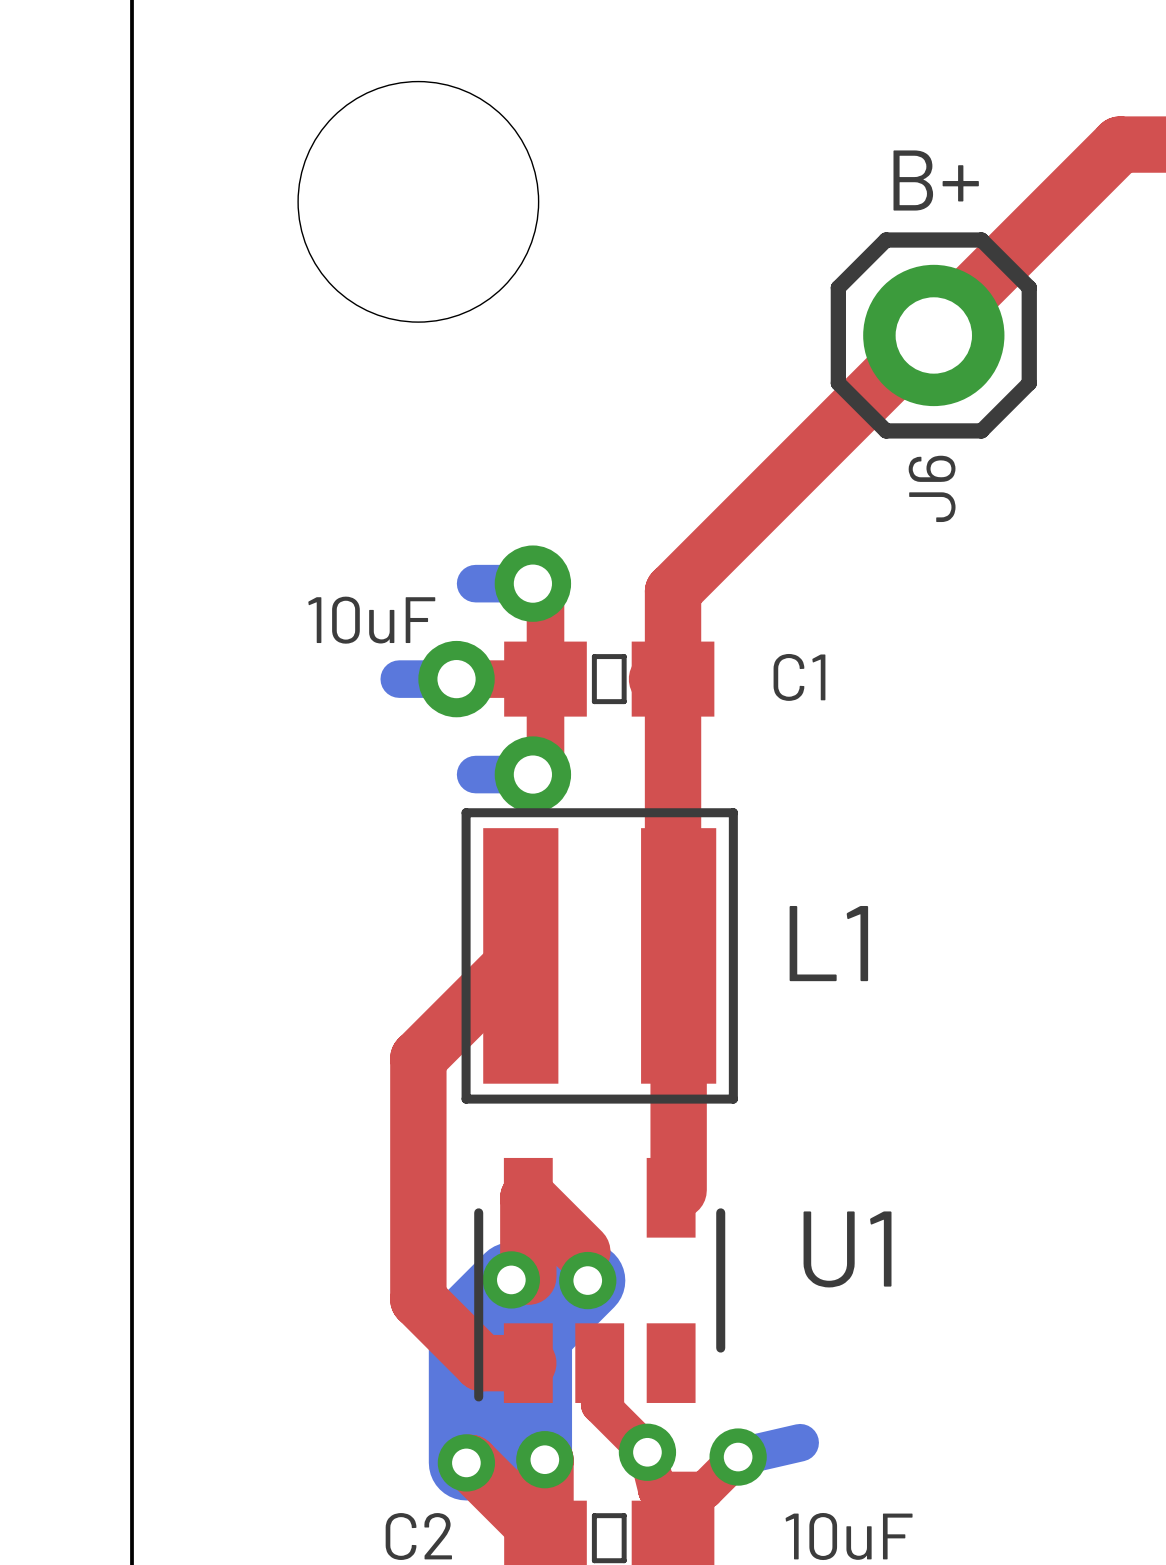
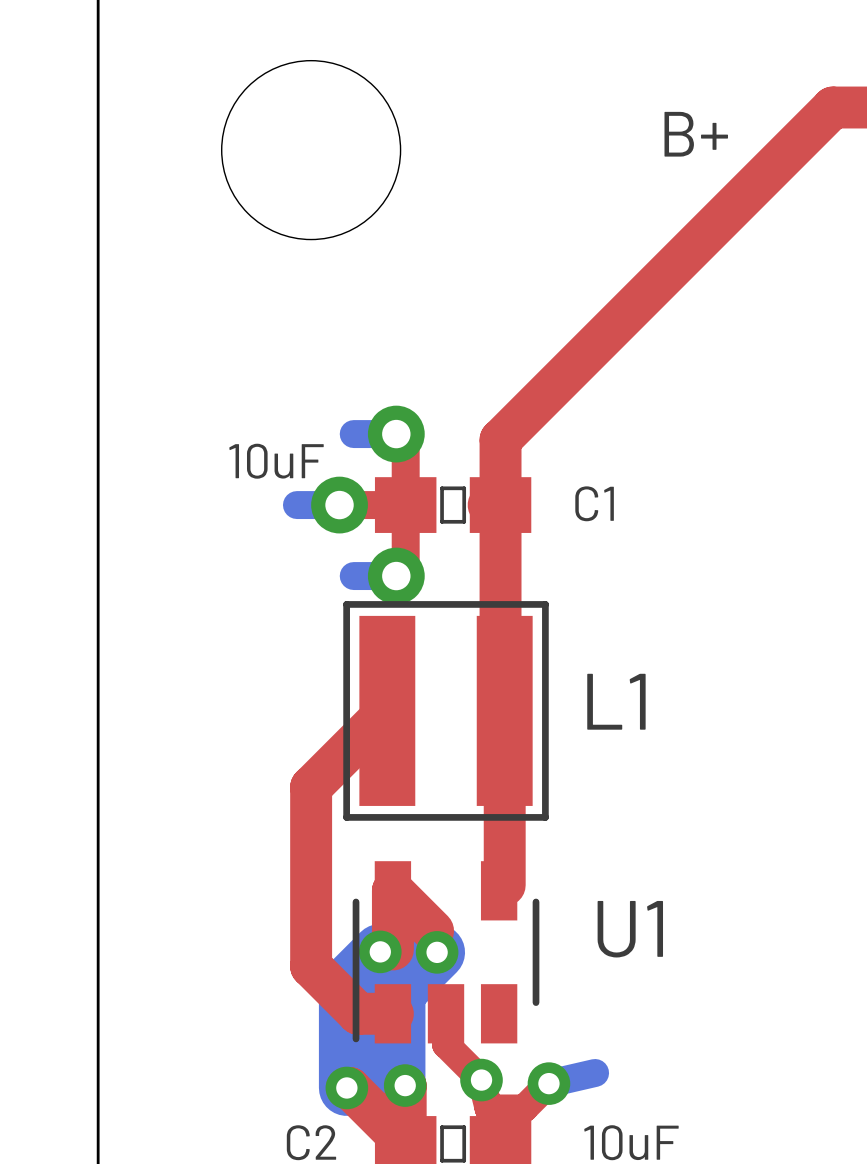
J6: (933, 335) -> none

